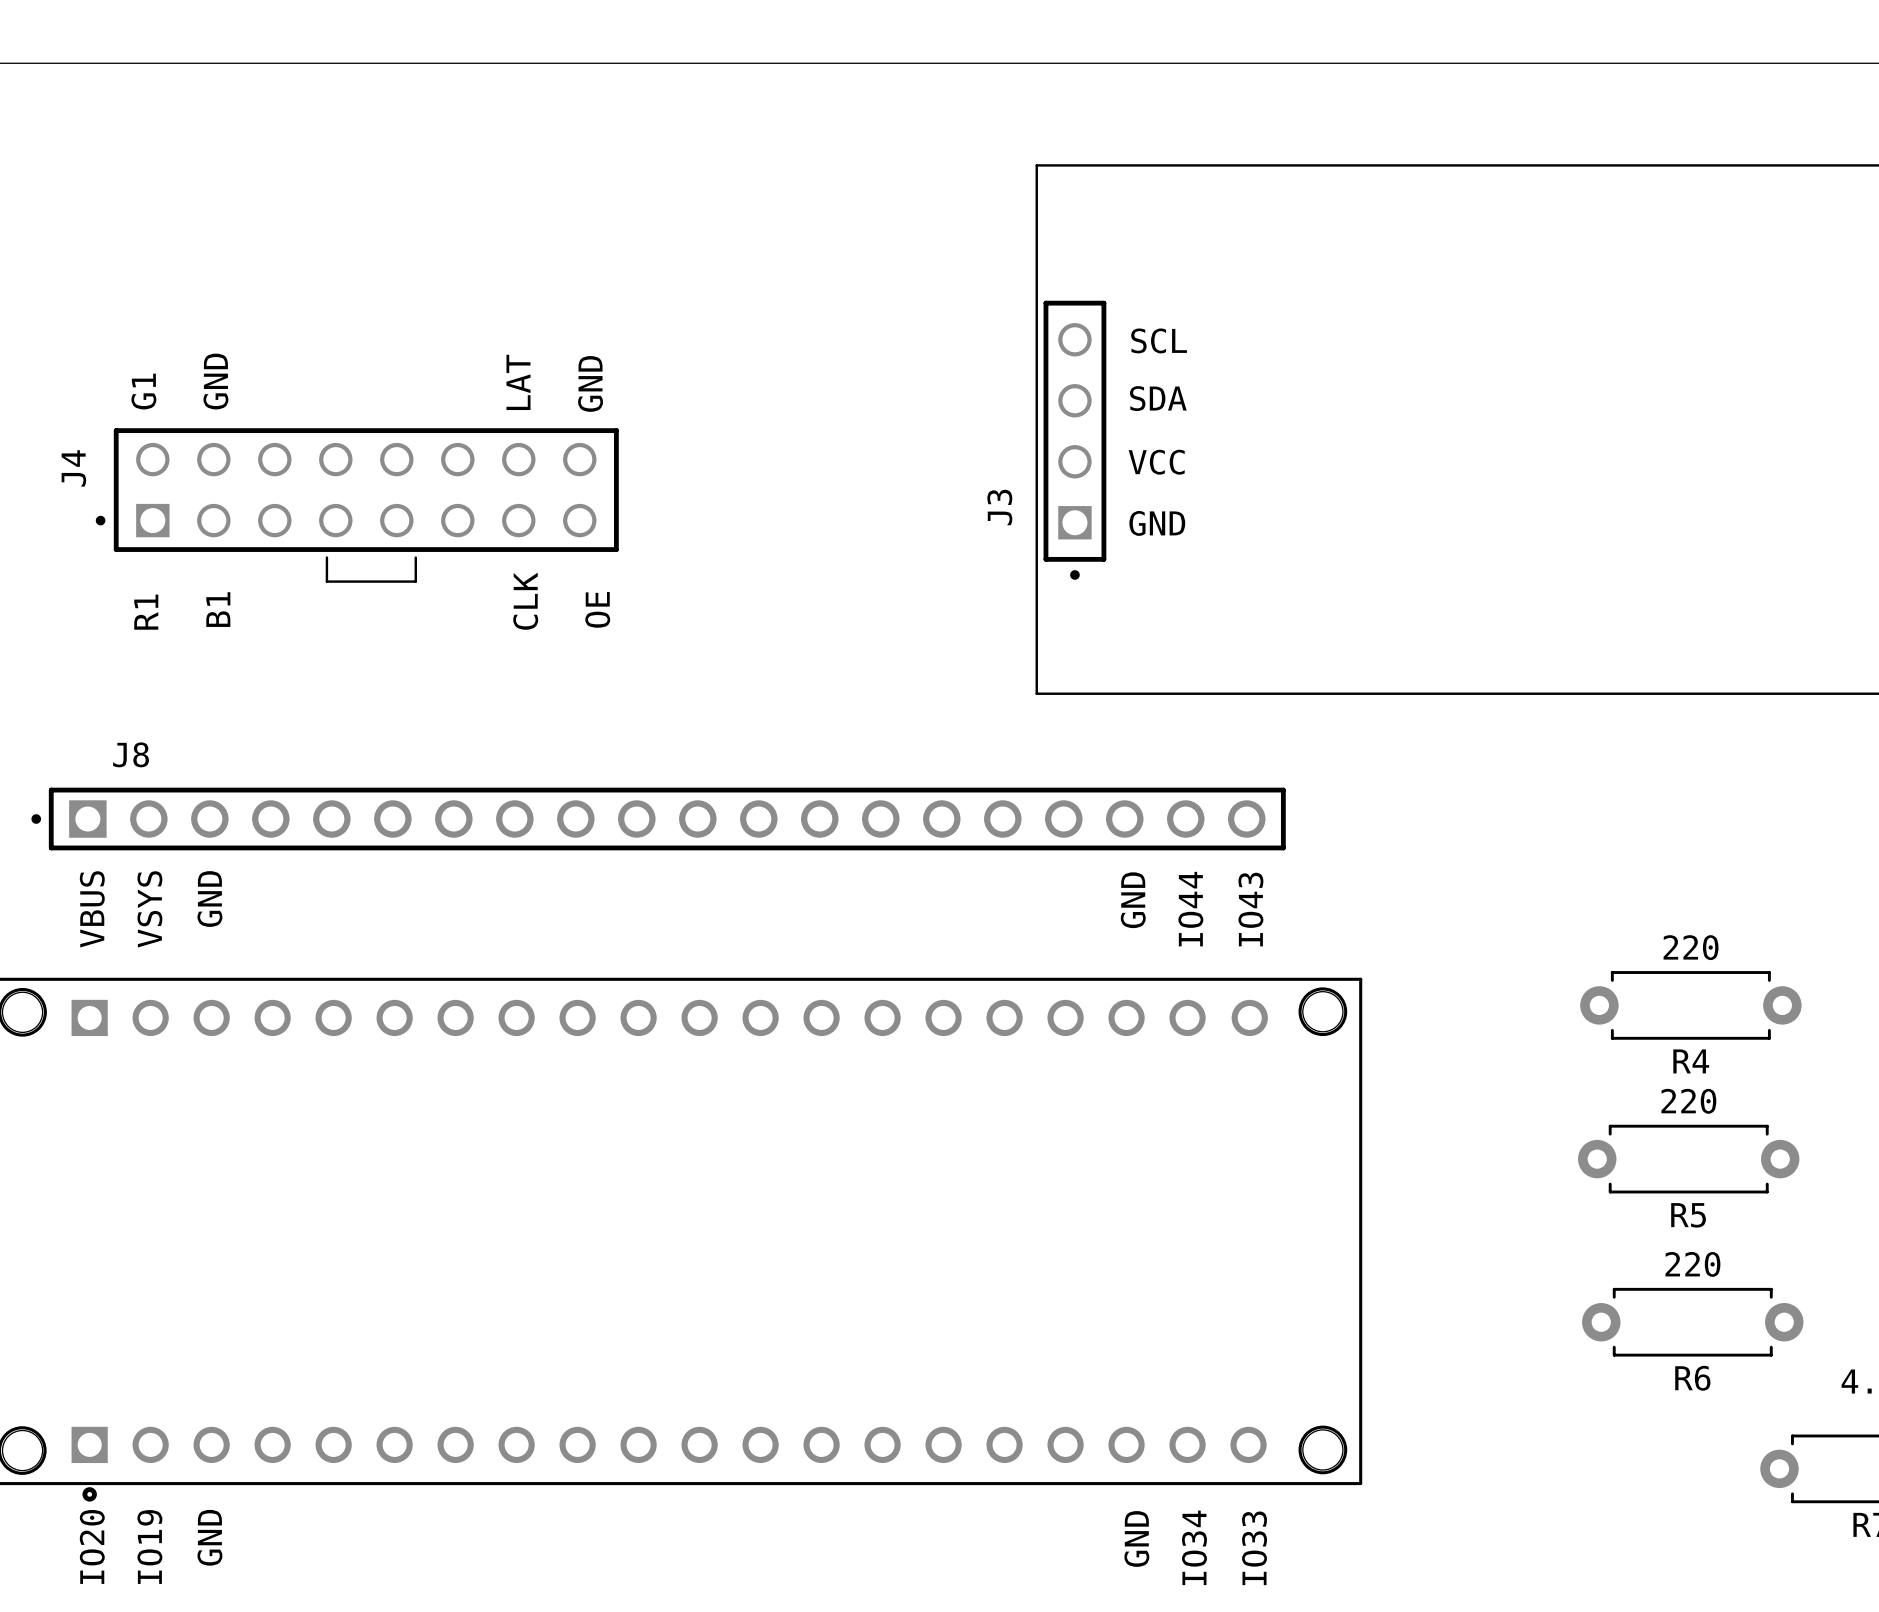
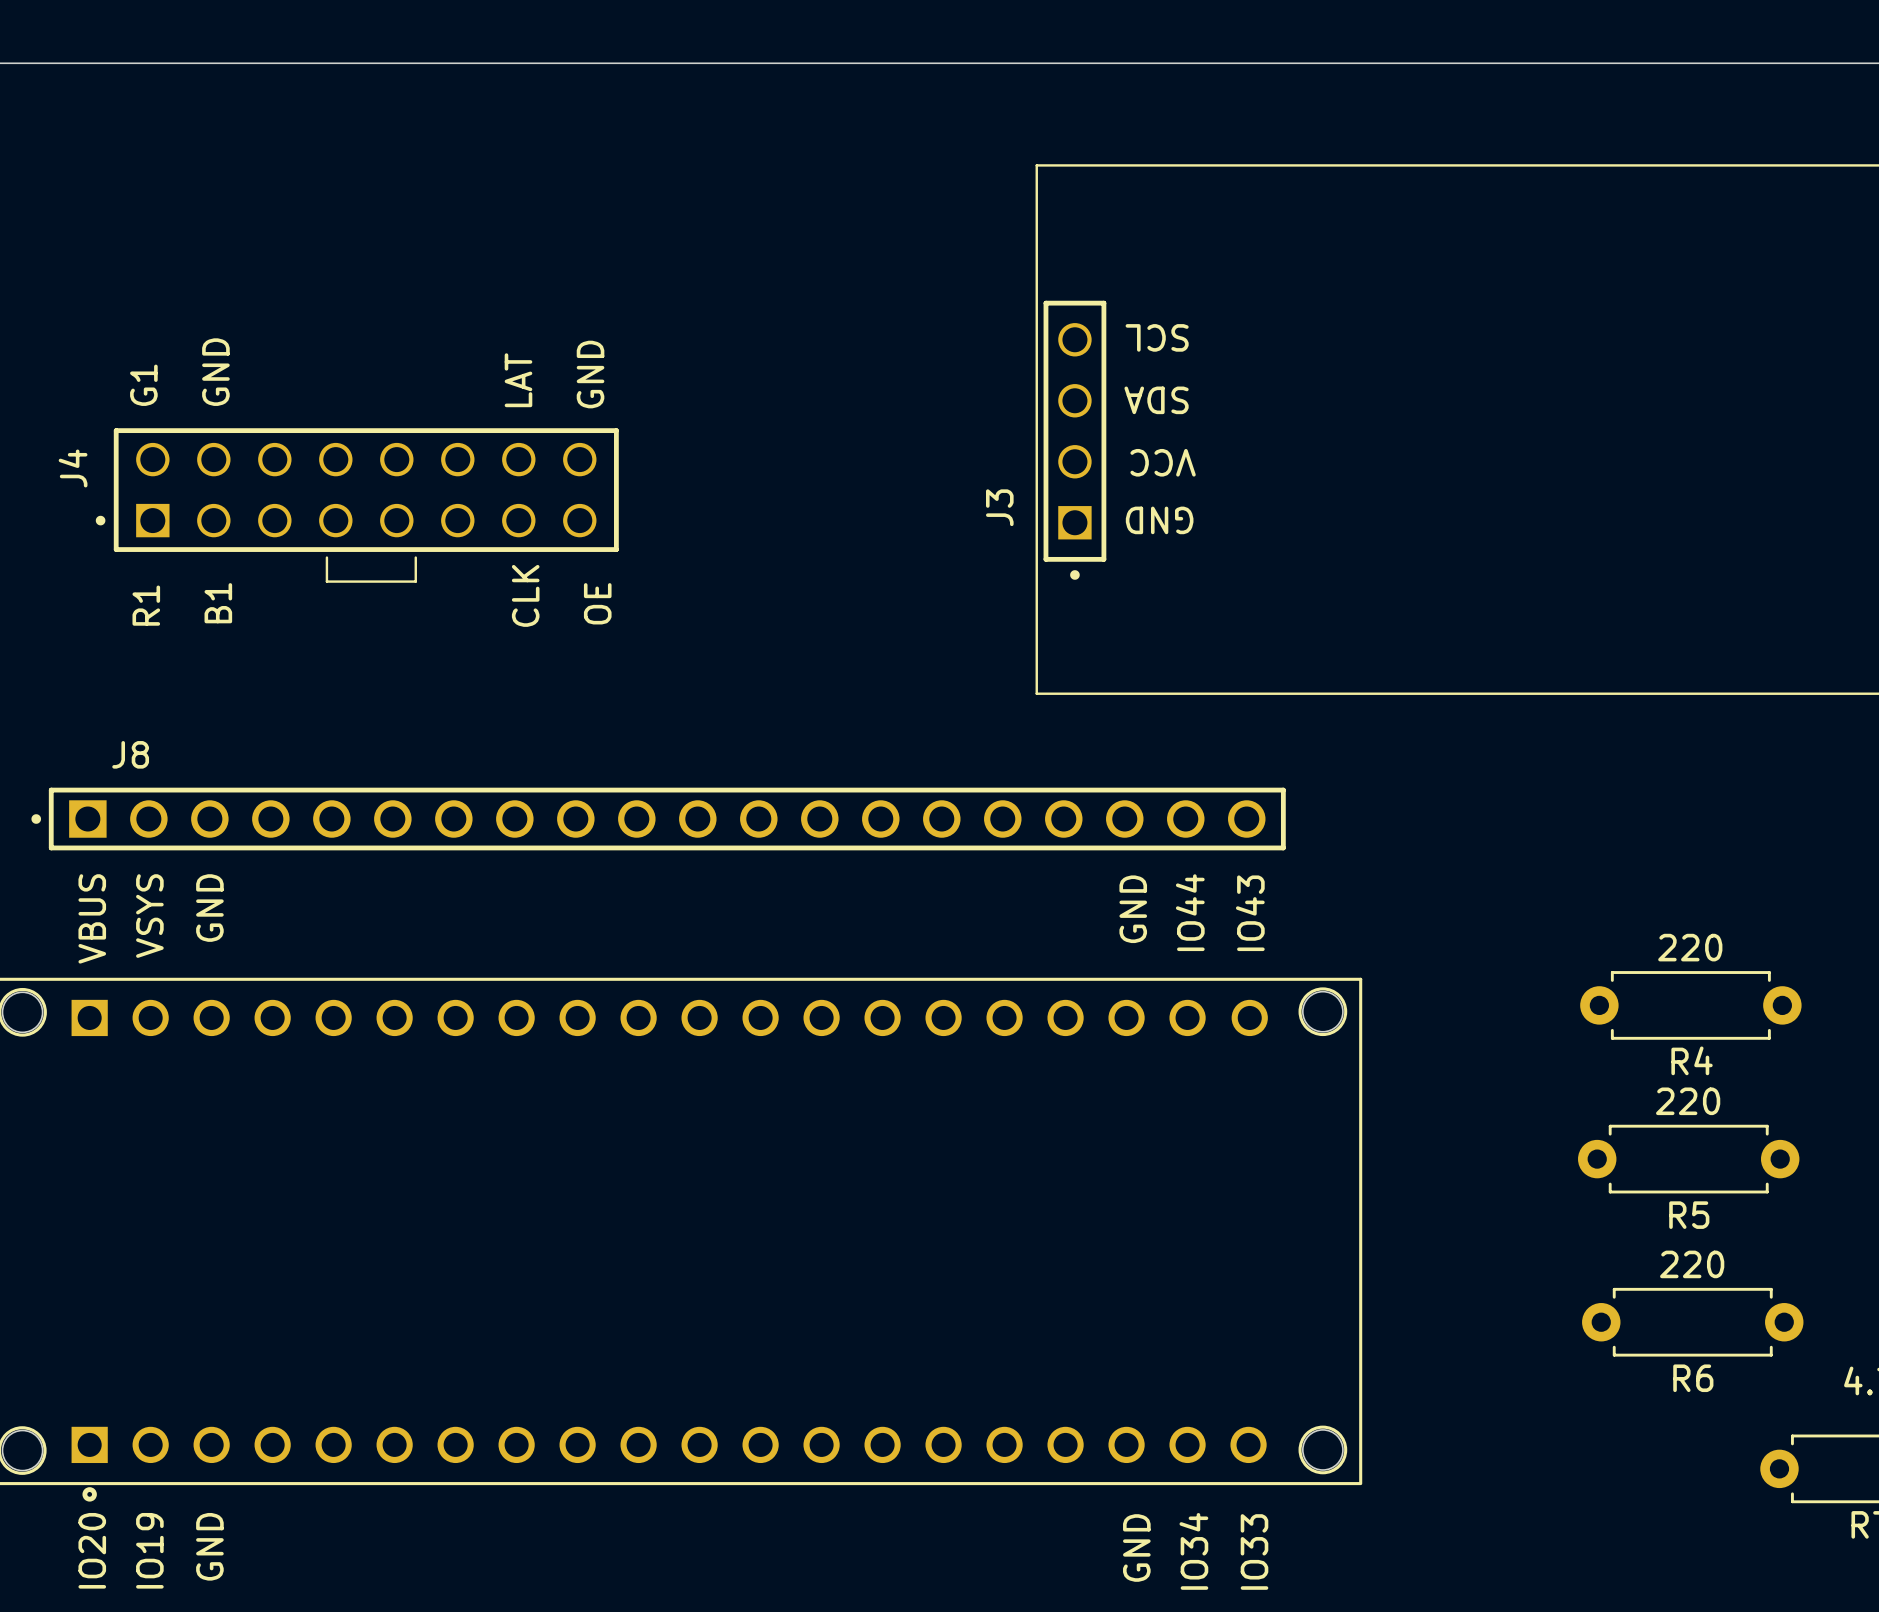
text rotation: 0° (1159, 340) -> 180° (1157, 337)
text rotation: 0° (1158, 398) -> 180° (1156, 400)
text rotation: 0° (1156, 462) -> 180° (1163, 462)
text rotation: 0° (1157, 523) -> 180° (1159, 520)

